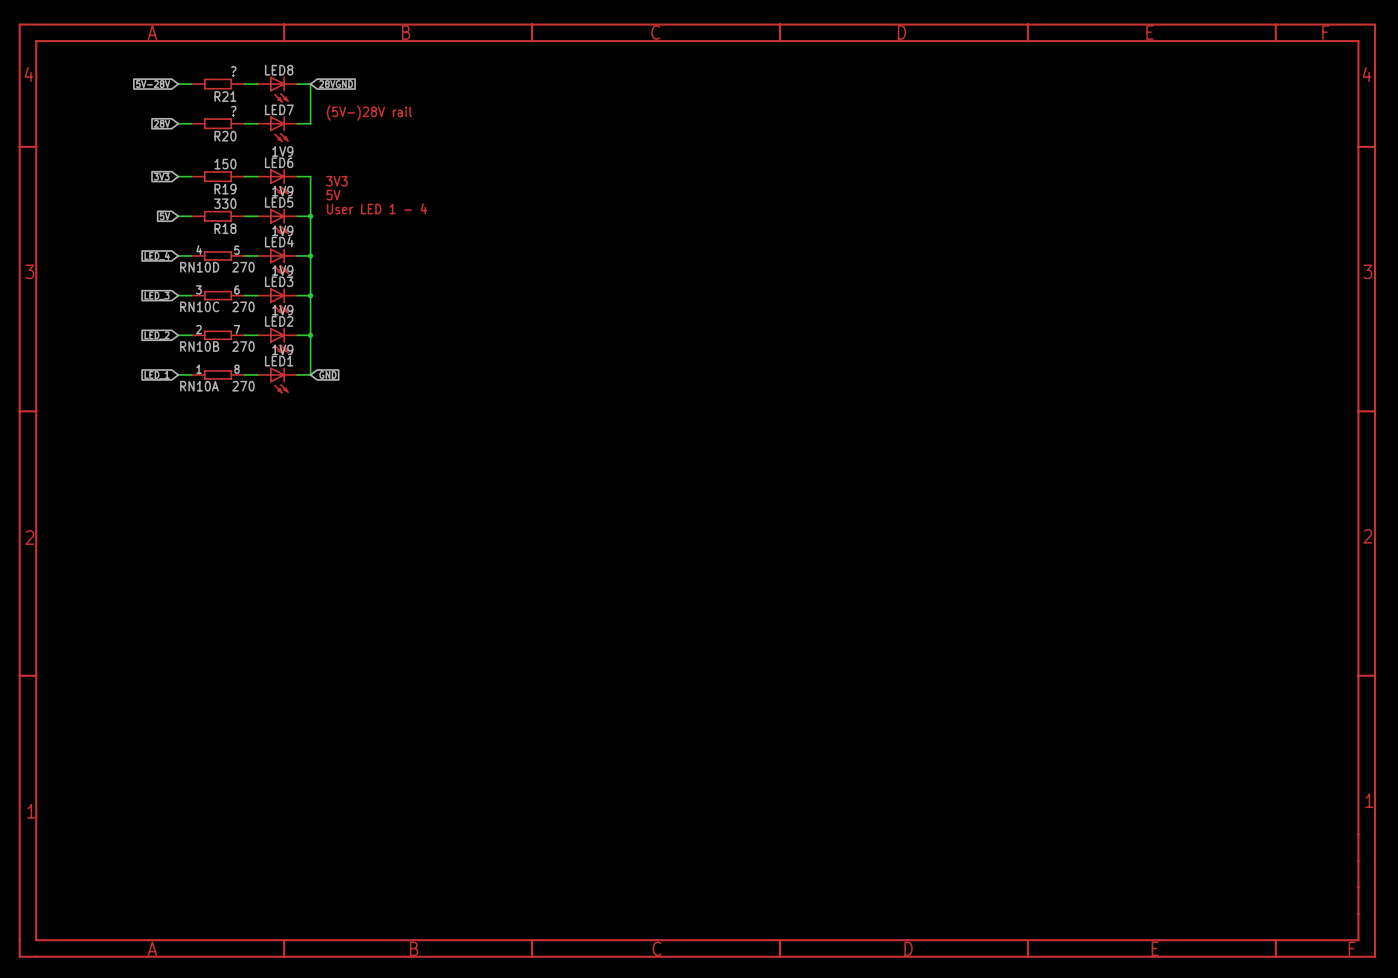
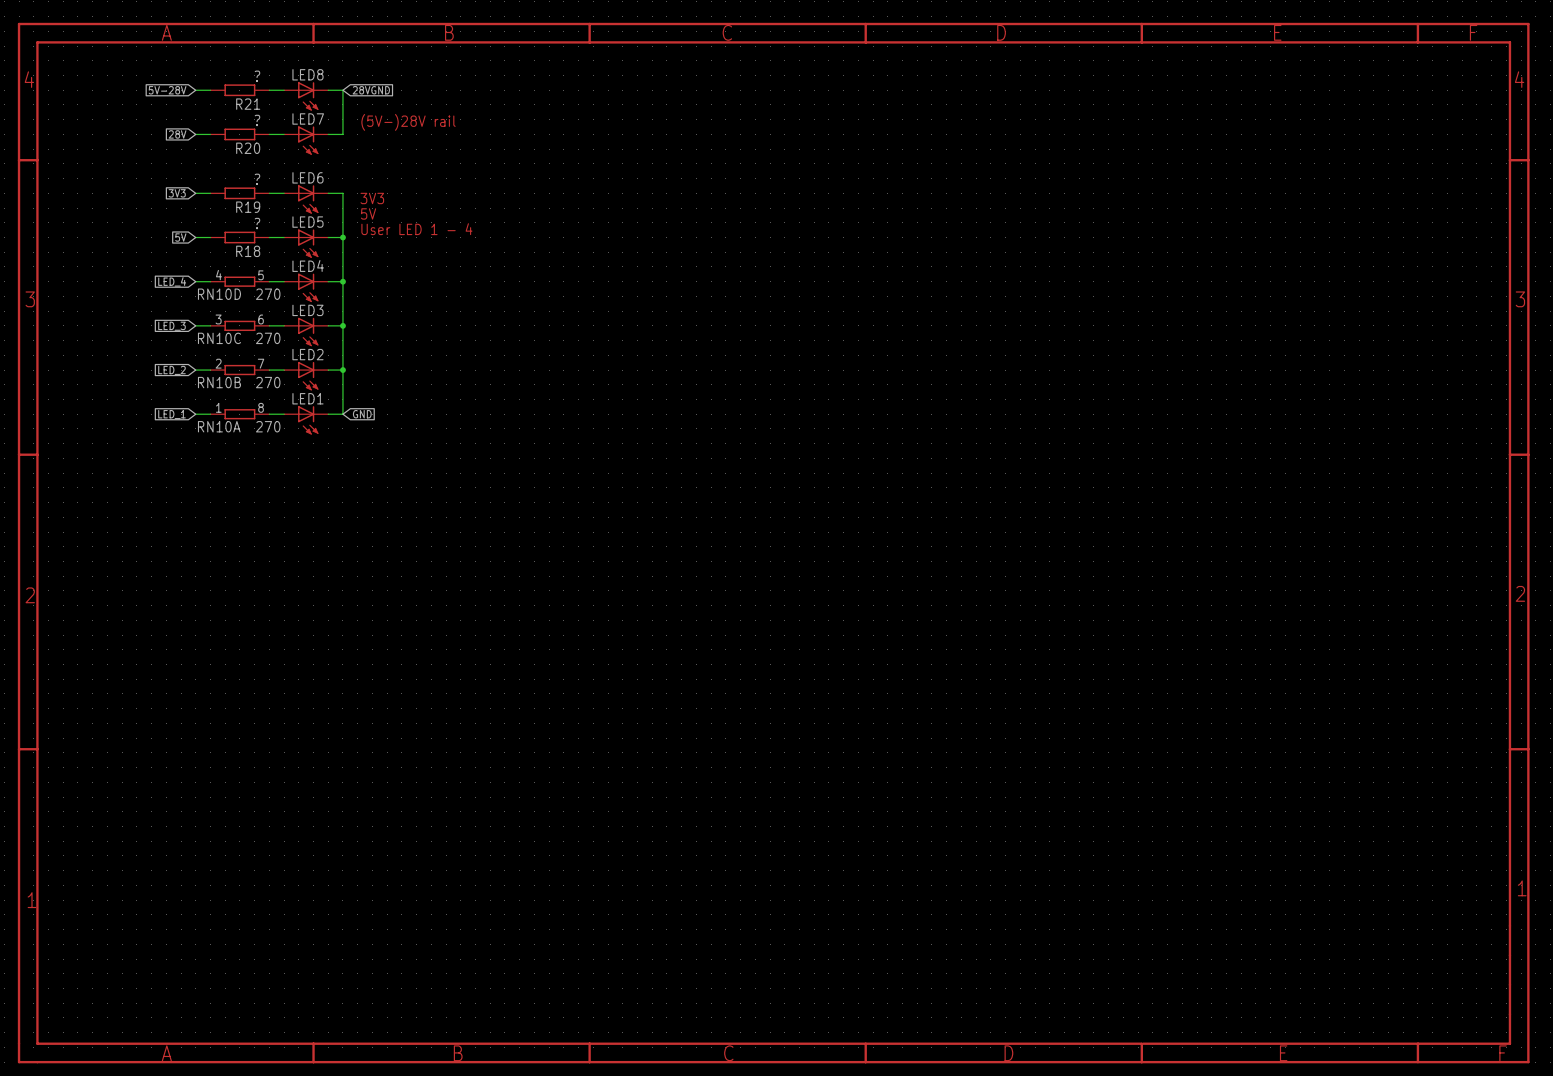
LED6 value: 1V9 (282, 151) -> none
R19 value: 150 (225, 164) -> ? (257, 179)
LED5 value: 1V9 (282, 191) -> none
R18 value: 330 (225, 203) -> ? (257, 223)
LED4 value: 1V9 (282, 230) -> none
LED3 value: 1V9 (282, 270) -> none
LED2 value: 1V9 (282, 310) -> none
LED1 value: 1V9 (282, 349) -> none

